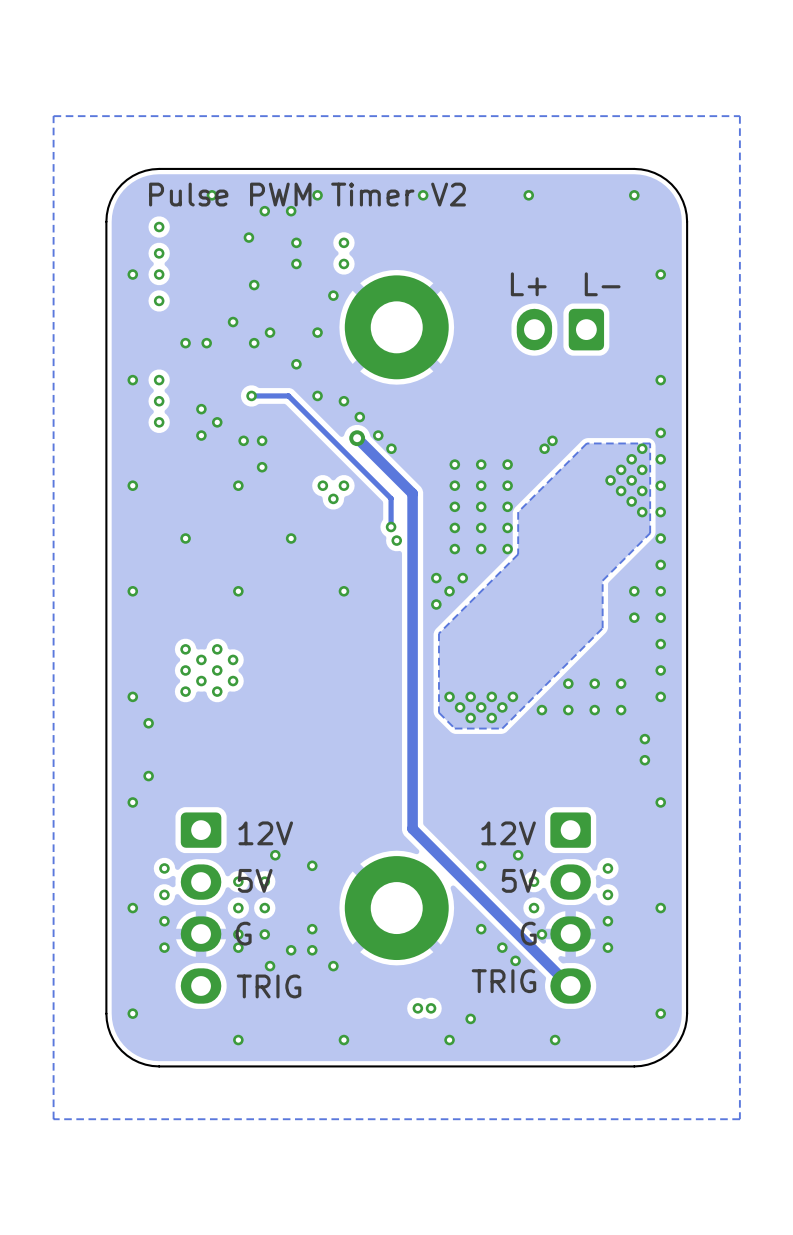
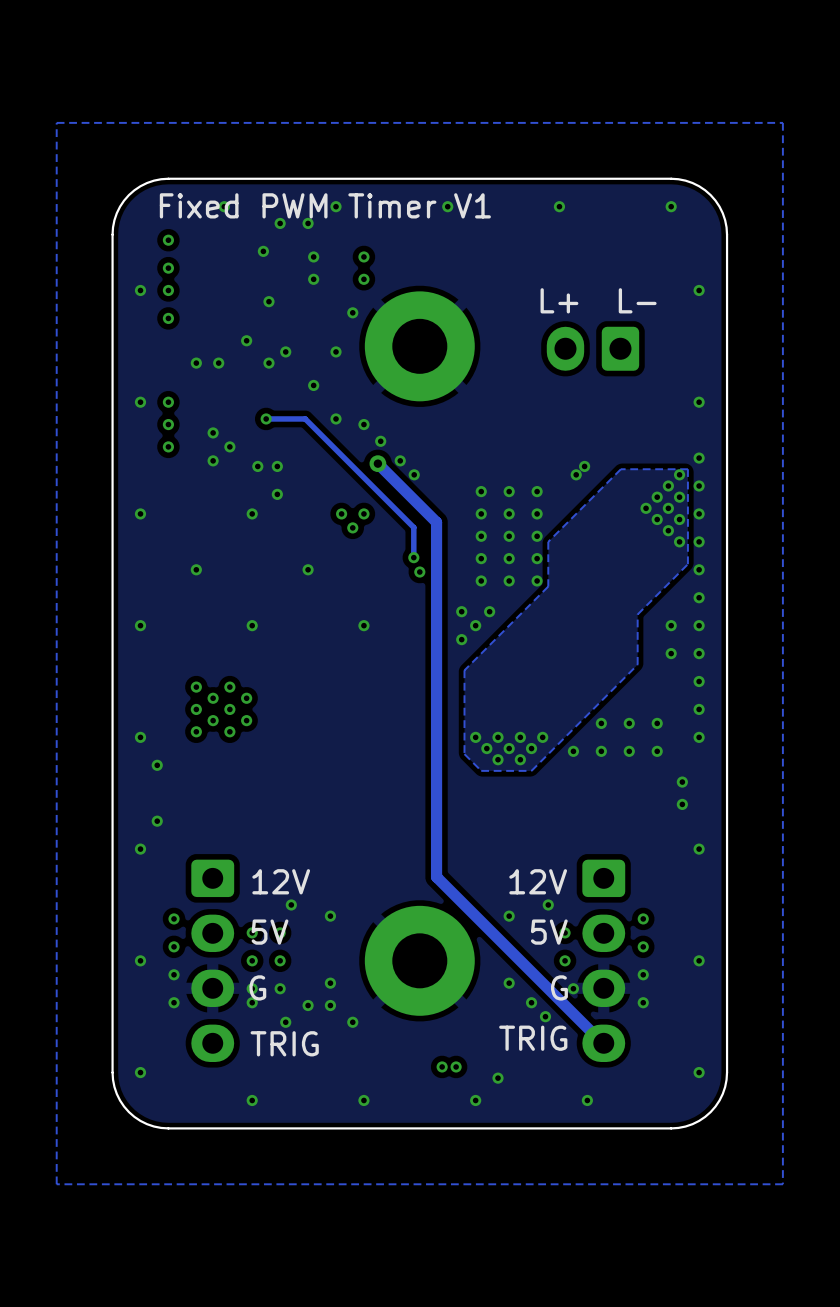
text: Pulse PWM Timer V2 (307, 194) -> Fixed PWM Timer V1 (325, 205)

